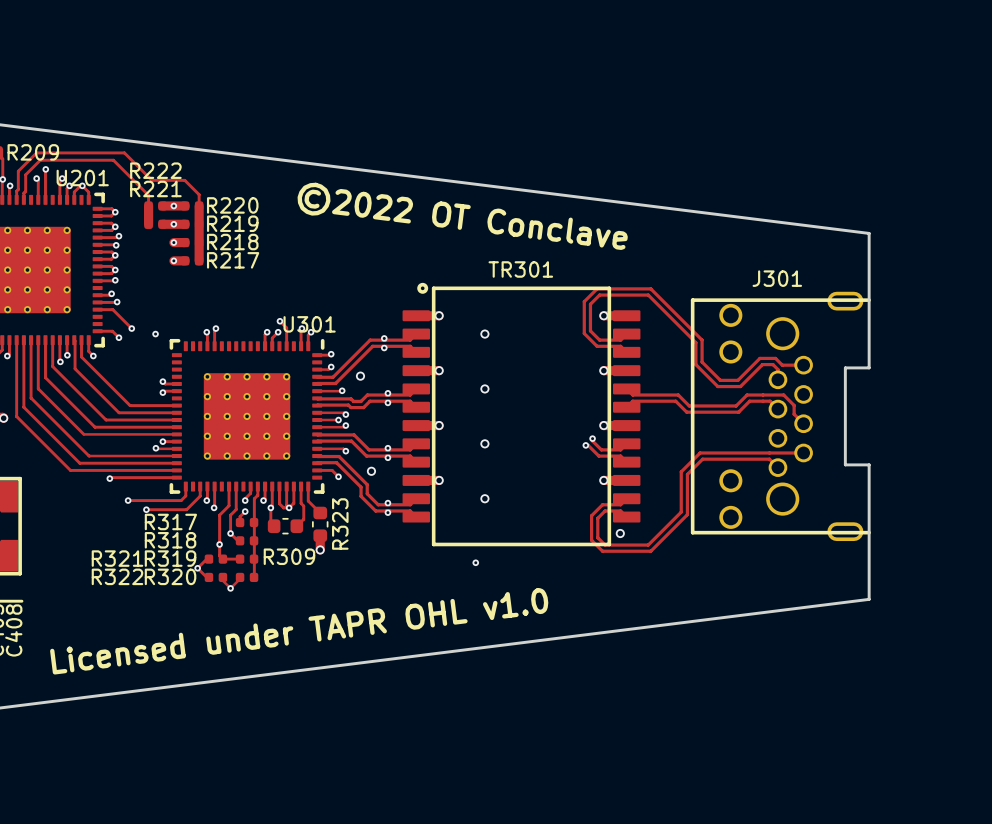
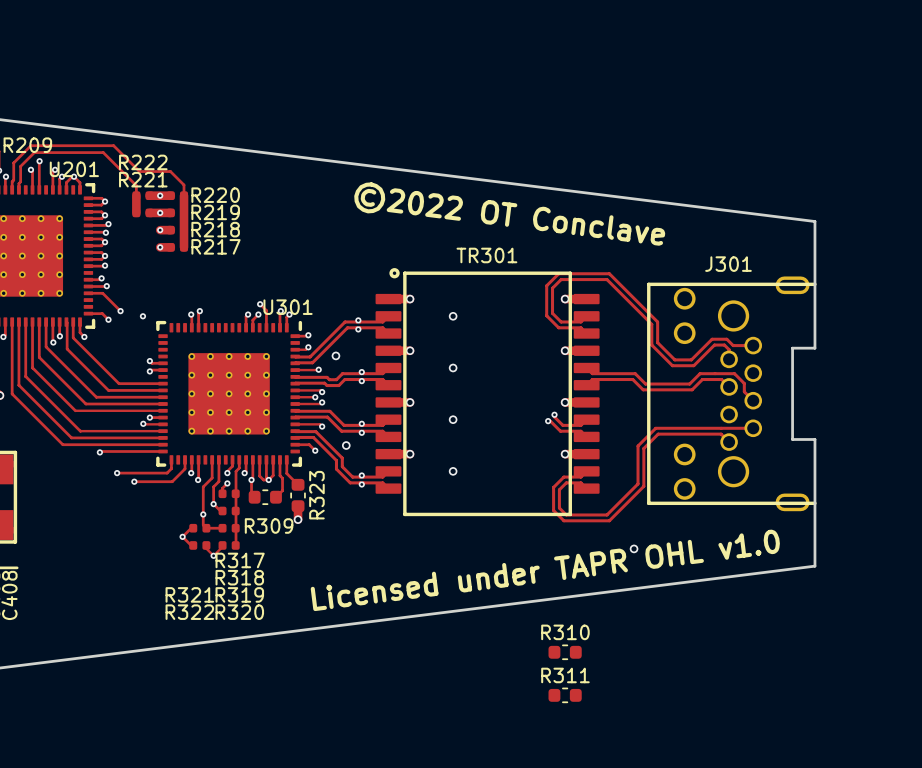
text position: ©2022 OT Conclave (462, 216) -> ©2022 OT Conclave (509, 214)
R317 name position: R317 (170, 521) -> R317 (240, 560)
via position: (620, 533) -> (634, 548)
R318 name position: R318 (170, 540) -> R318 (239, 577)
R321 name position: R321 (117, 558) -> R321 (189, 594)
R319 name position: R319 (170, 558) -> R319 (239, 594)
via: (475, 562) -> none
R322 name position: R322 (117, 576) -> R322 (189, 612)
R320 name position: R320 (170, 576) -> R320 (239, 612)
text position: Licensed under TAPR OHL v1.0 (299, 631) -> Licensed under TAPR OHL v1.0 (545, 570)
R310: none -> (565, 652)
R311: none -> (565, 695)

